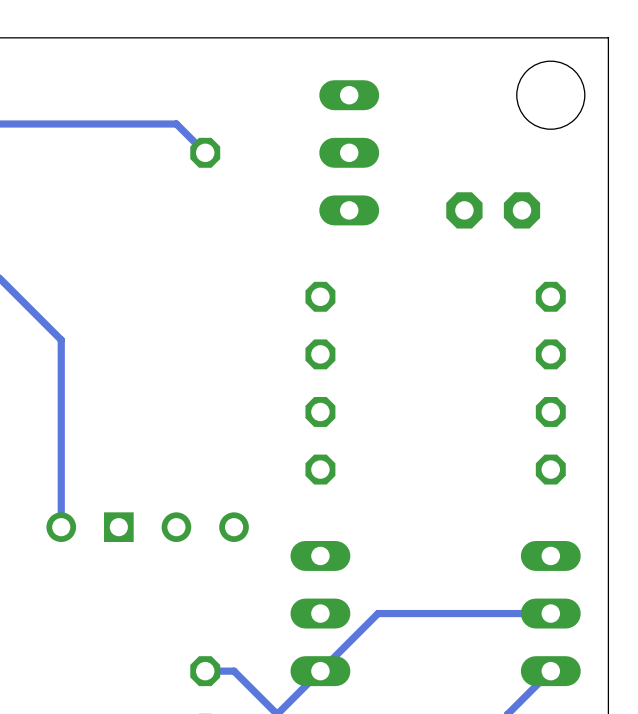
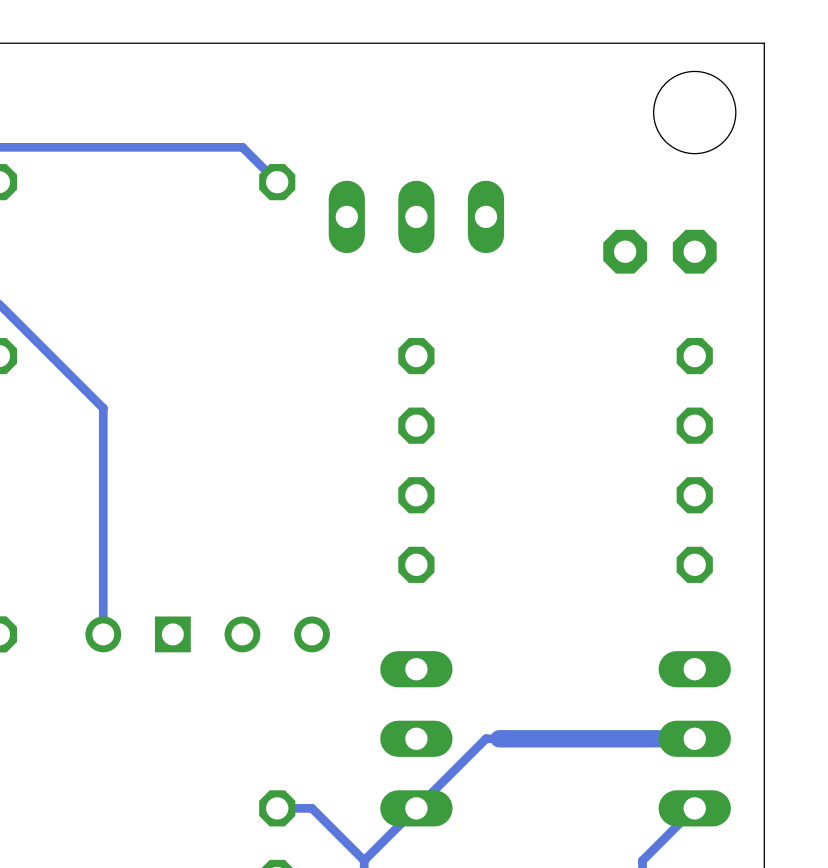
part rotation: 0° (349, 152) -> 90° clockwise (416, 216)
part position: (493, 210) -> (659, 251)
track width: thin (550, 613) (388, 613) -> thick (694, 738) (499, 738)

